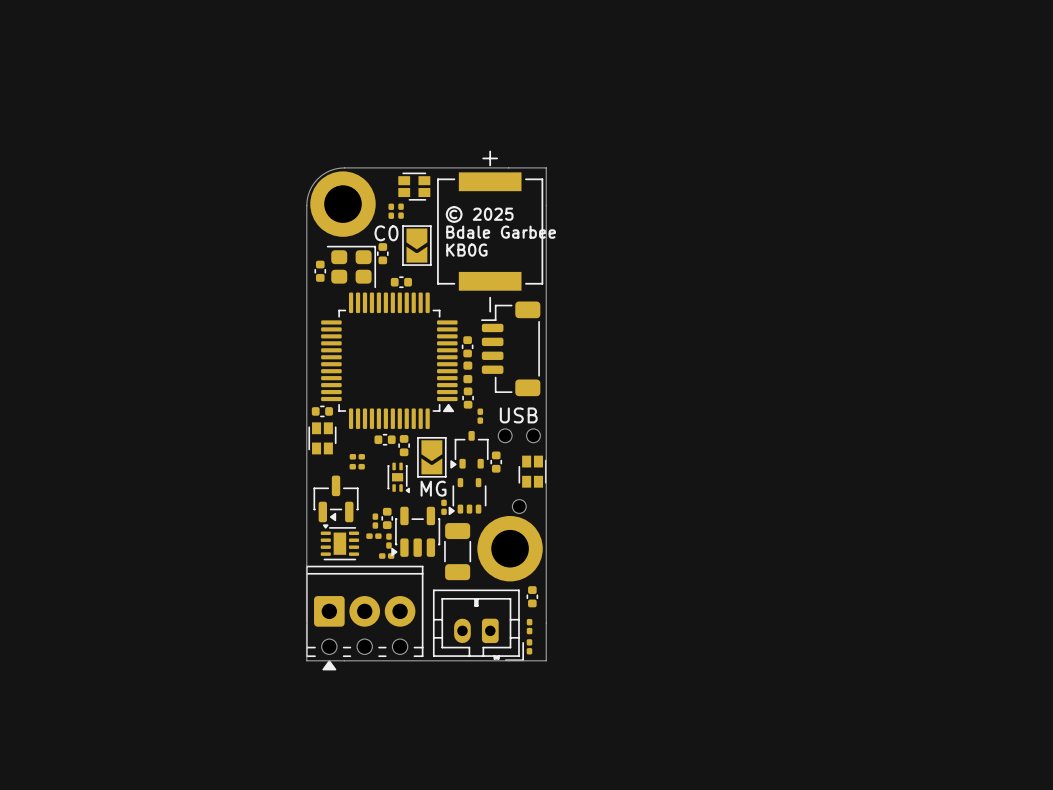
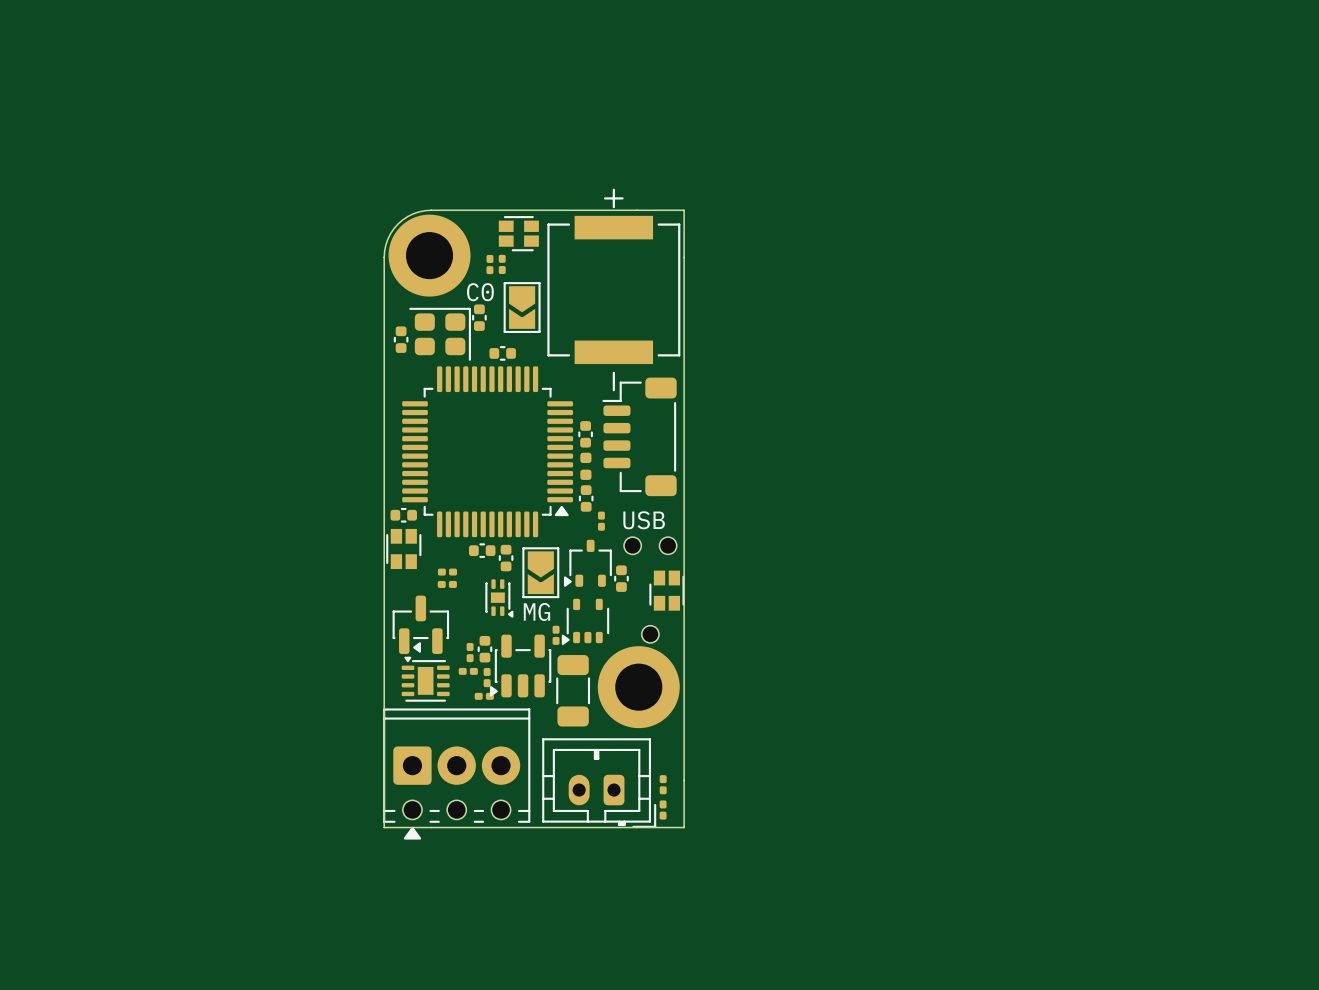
text: © 2025 (479, 214) -> none
text: Bdale Garbee (501, 232) -> none
text: KB0G (466, 250) -> none
part: (532, 596) -> none

